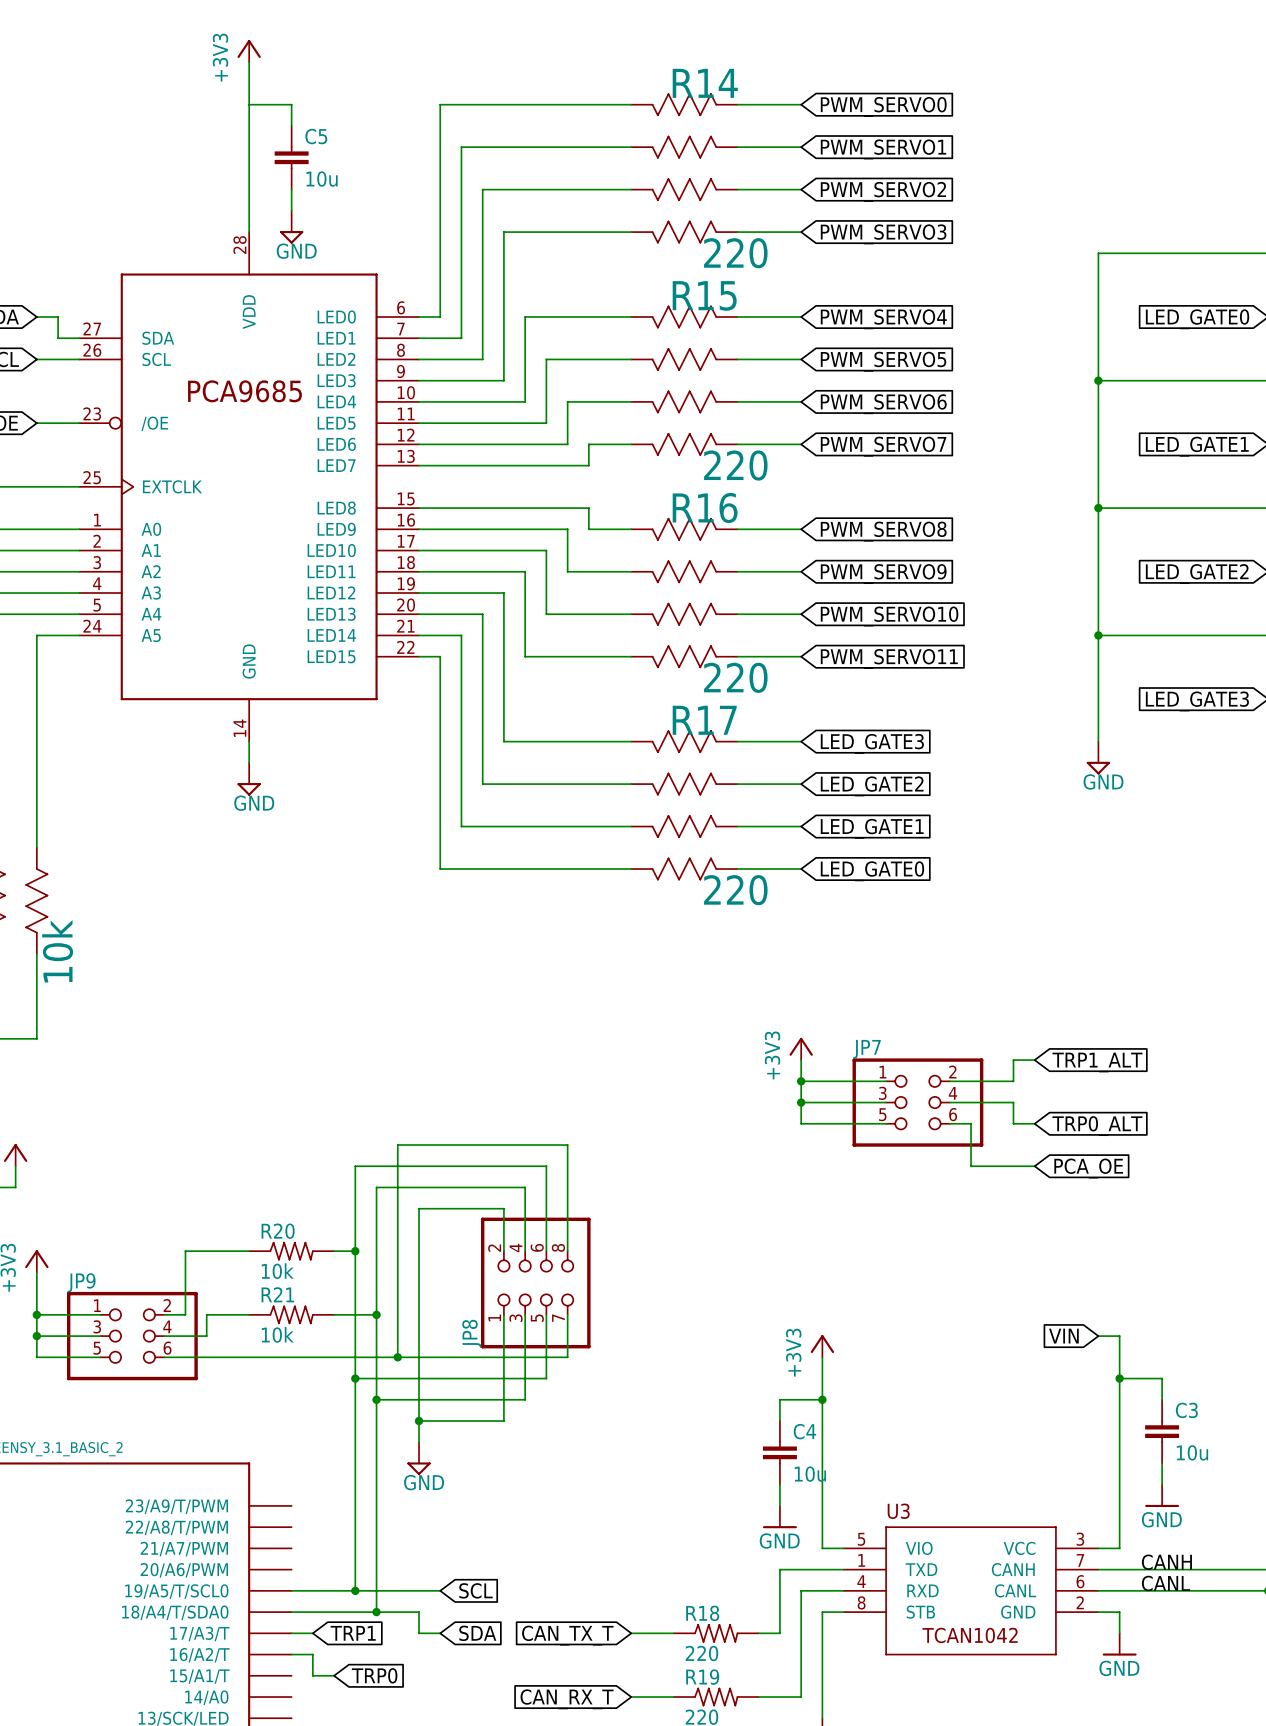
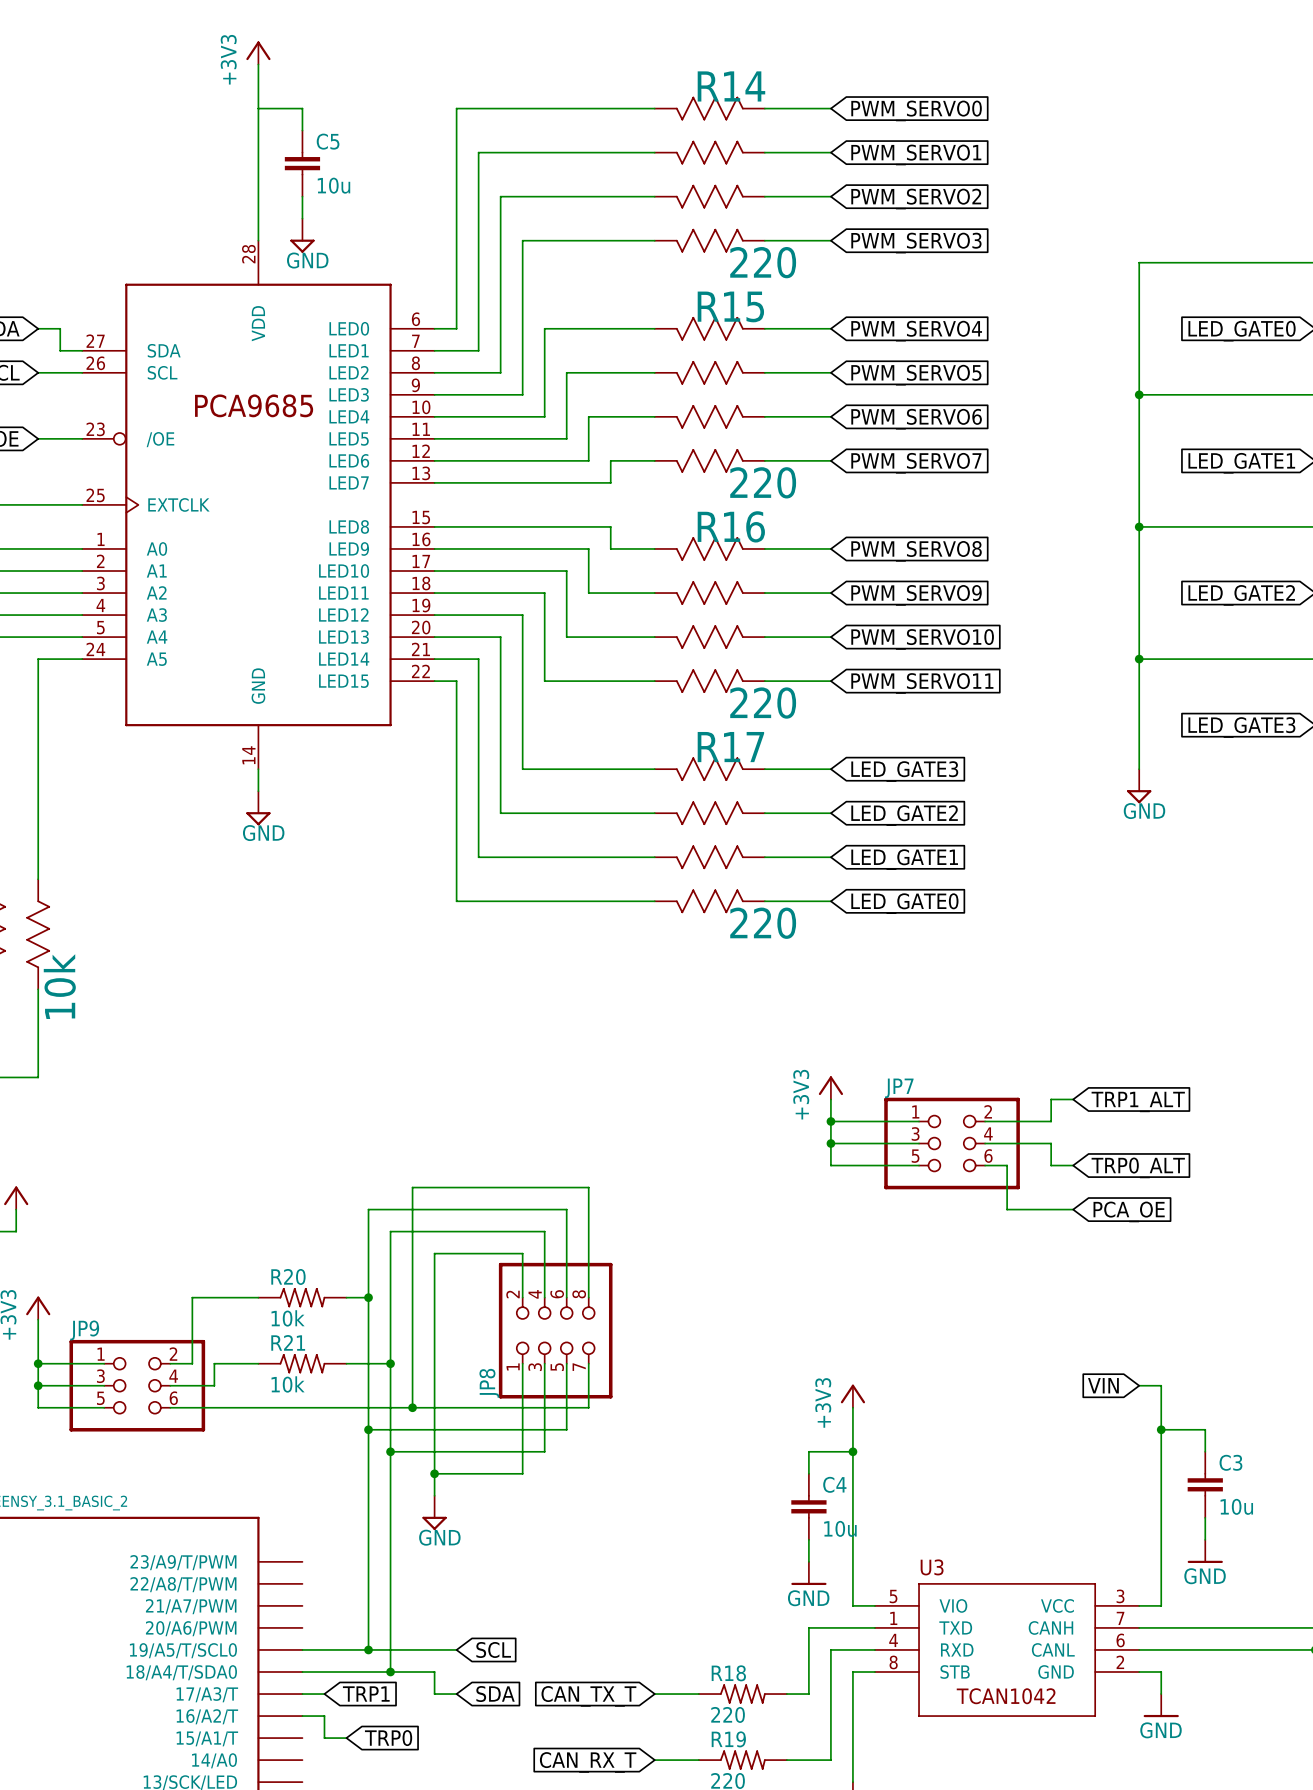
label: CANH (1166, 1562) -> none
label: CANL (1165, 1583) -> none

